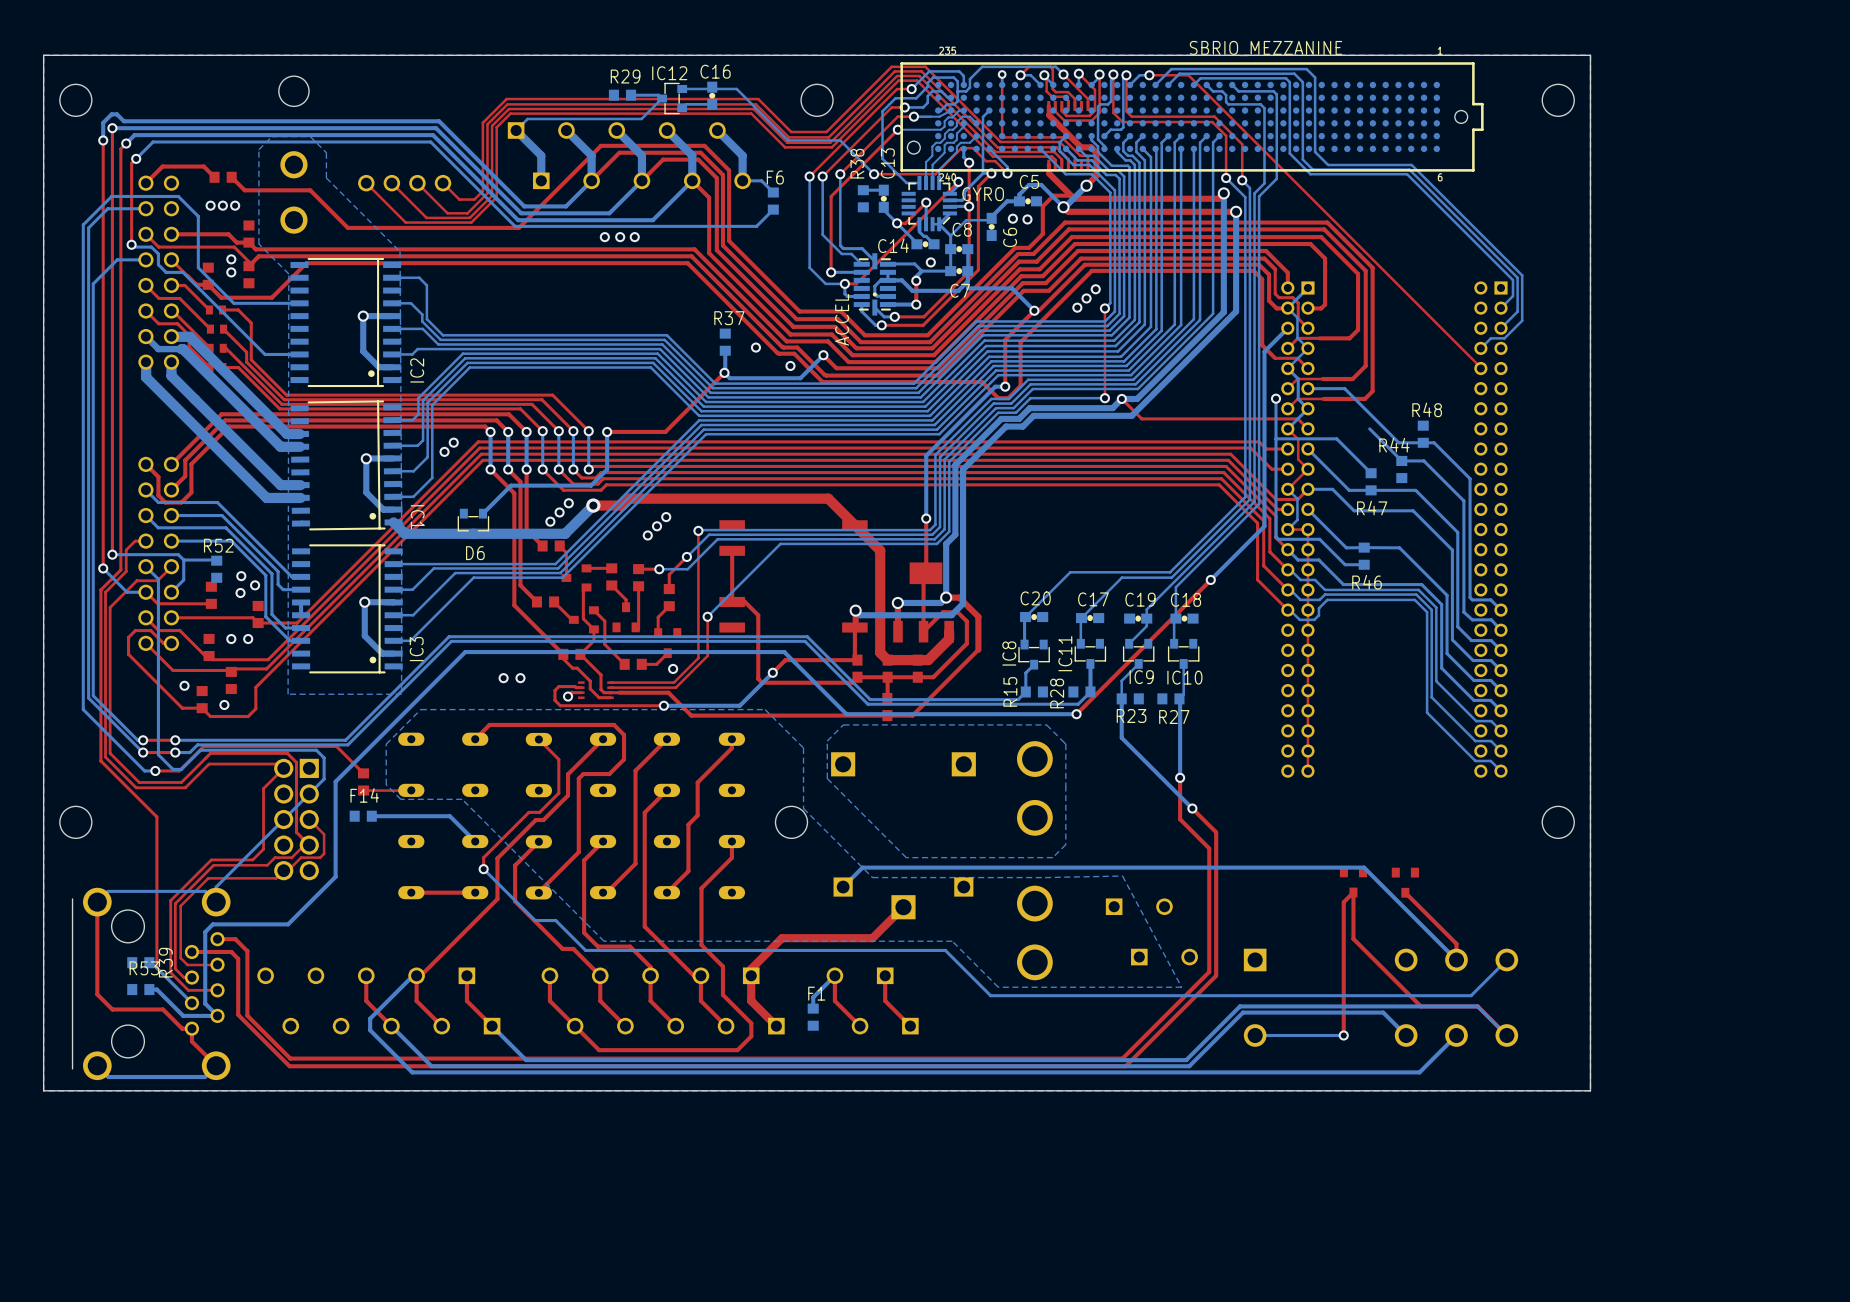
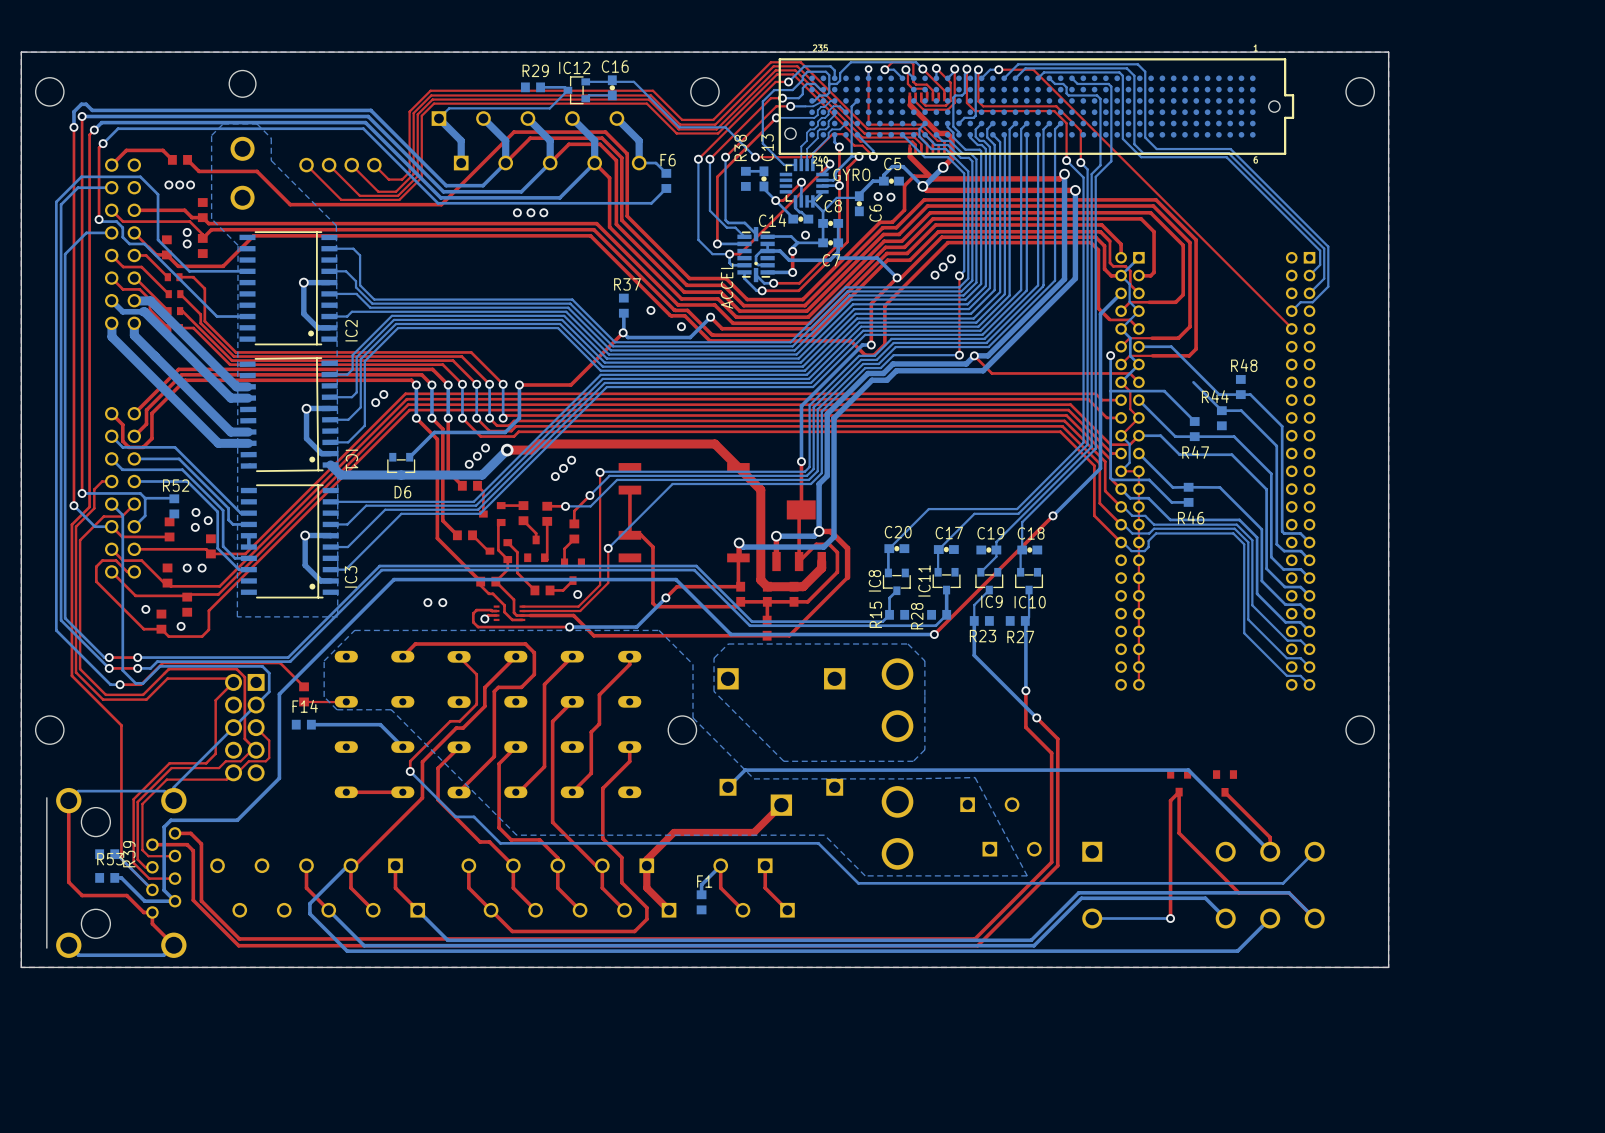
SBRIO_MEZZANINE name: SBRIO_MEZZANINE (1266, 48) -> none

